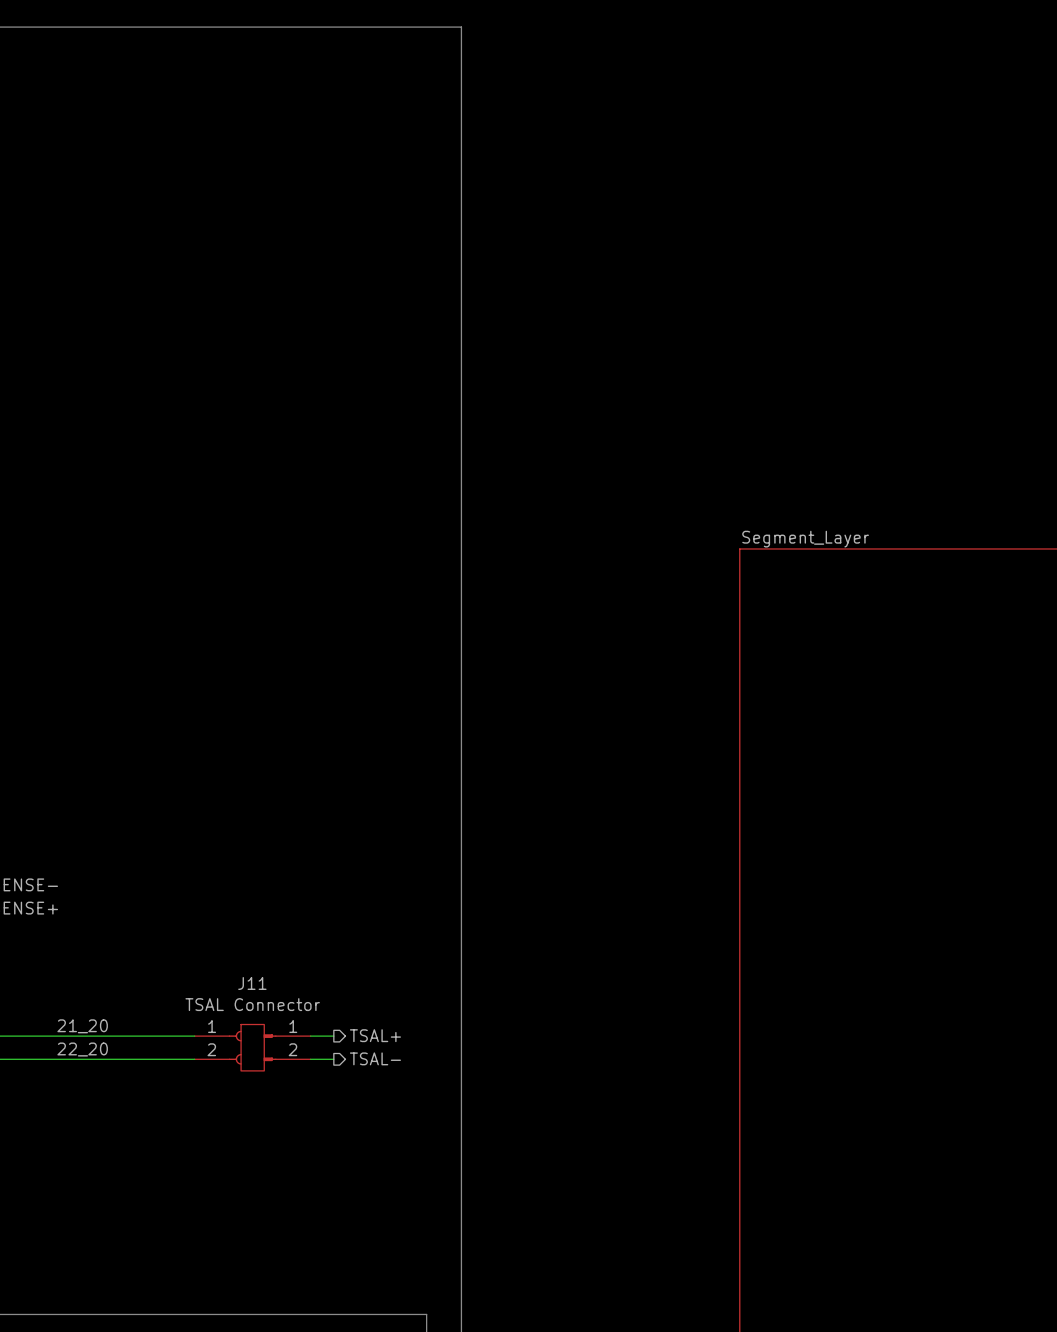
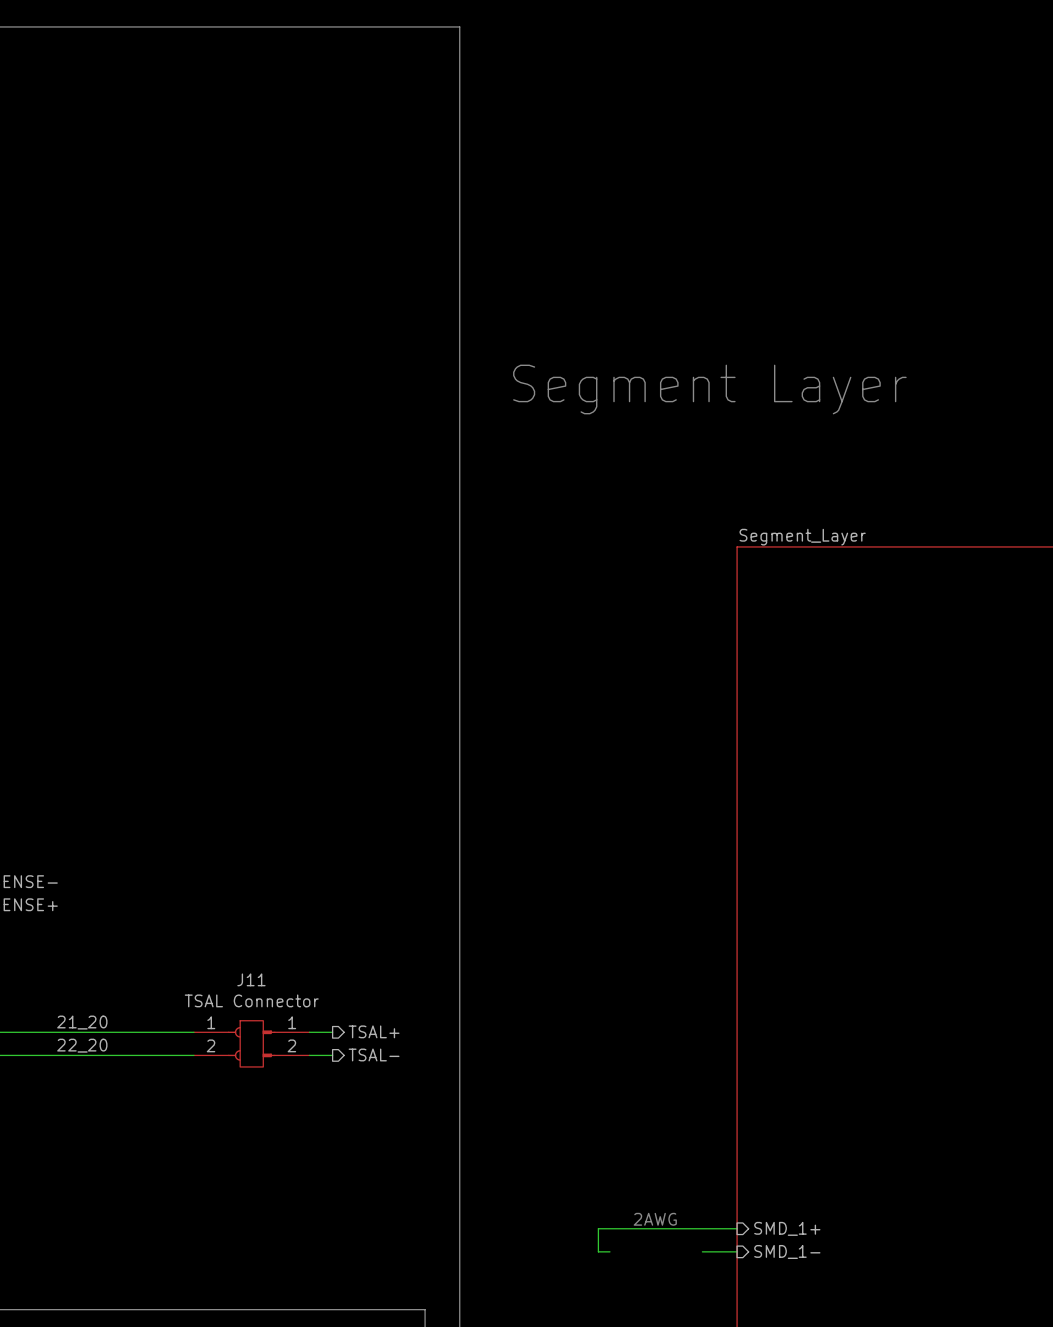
text: none -> Segment Layer (709, 389)
text: none -> 2AWG (655, 1219)
wire: none -> (737, 1228) (598, 1228) (598, 1251) (609, 1251)
sheet pin: none -> SMD_1+ (787, 1228)
wire: none -> (702, 1251) (737, 1251)
sheet pin: none -> SMD_1- (787, 1251)

